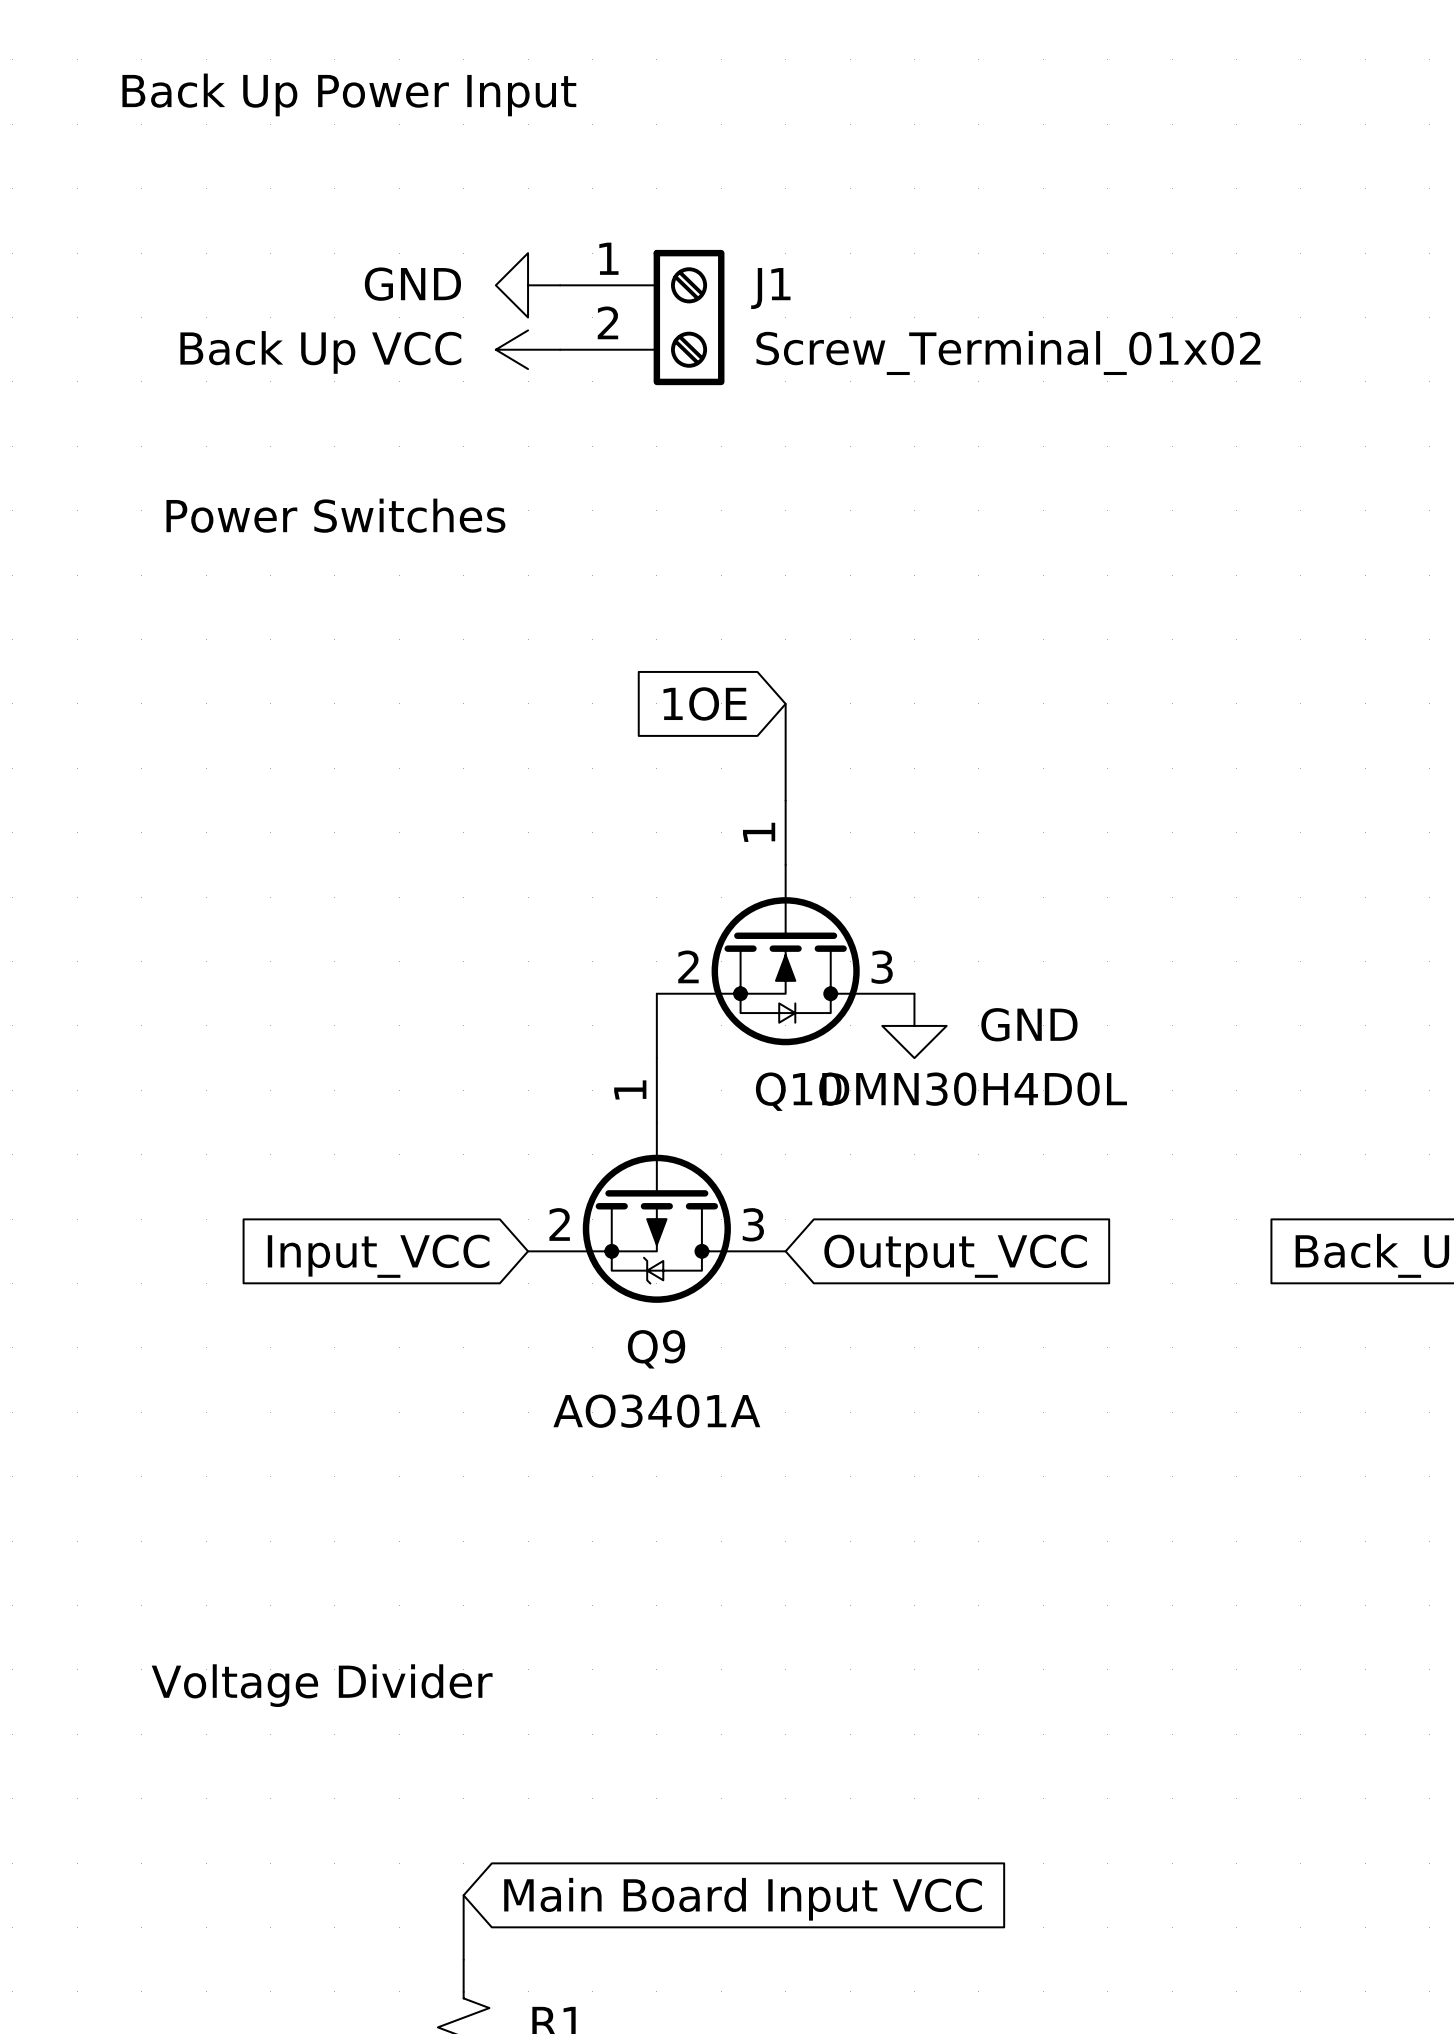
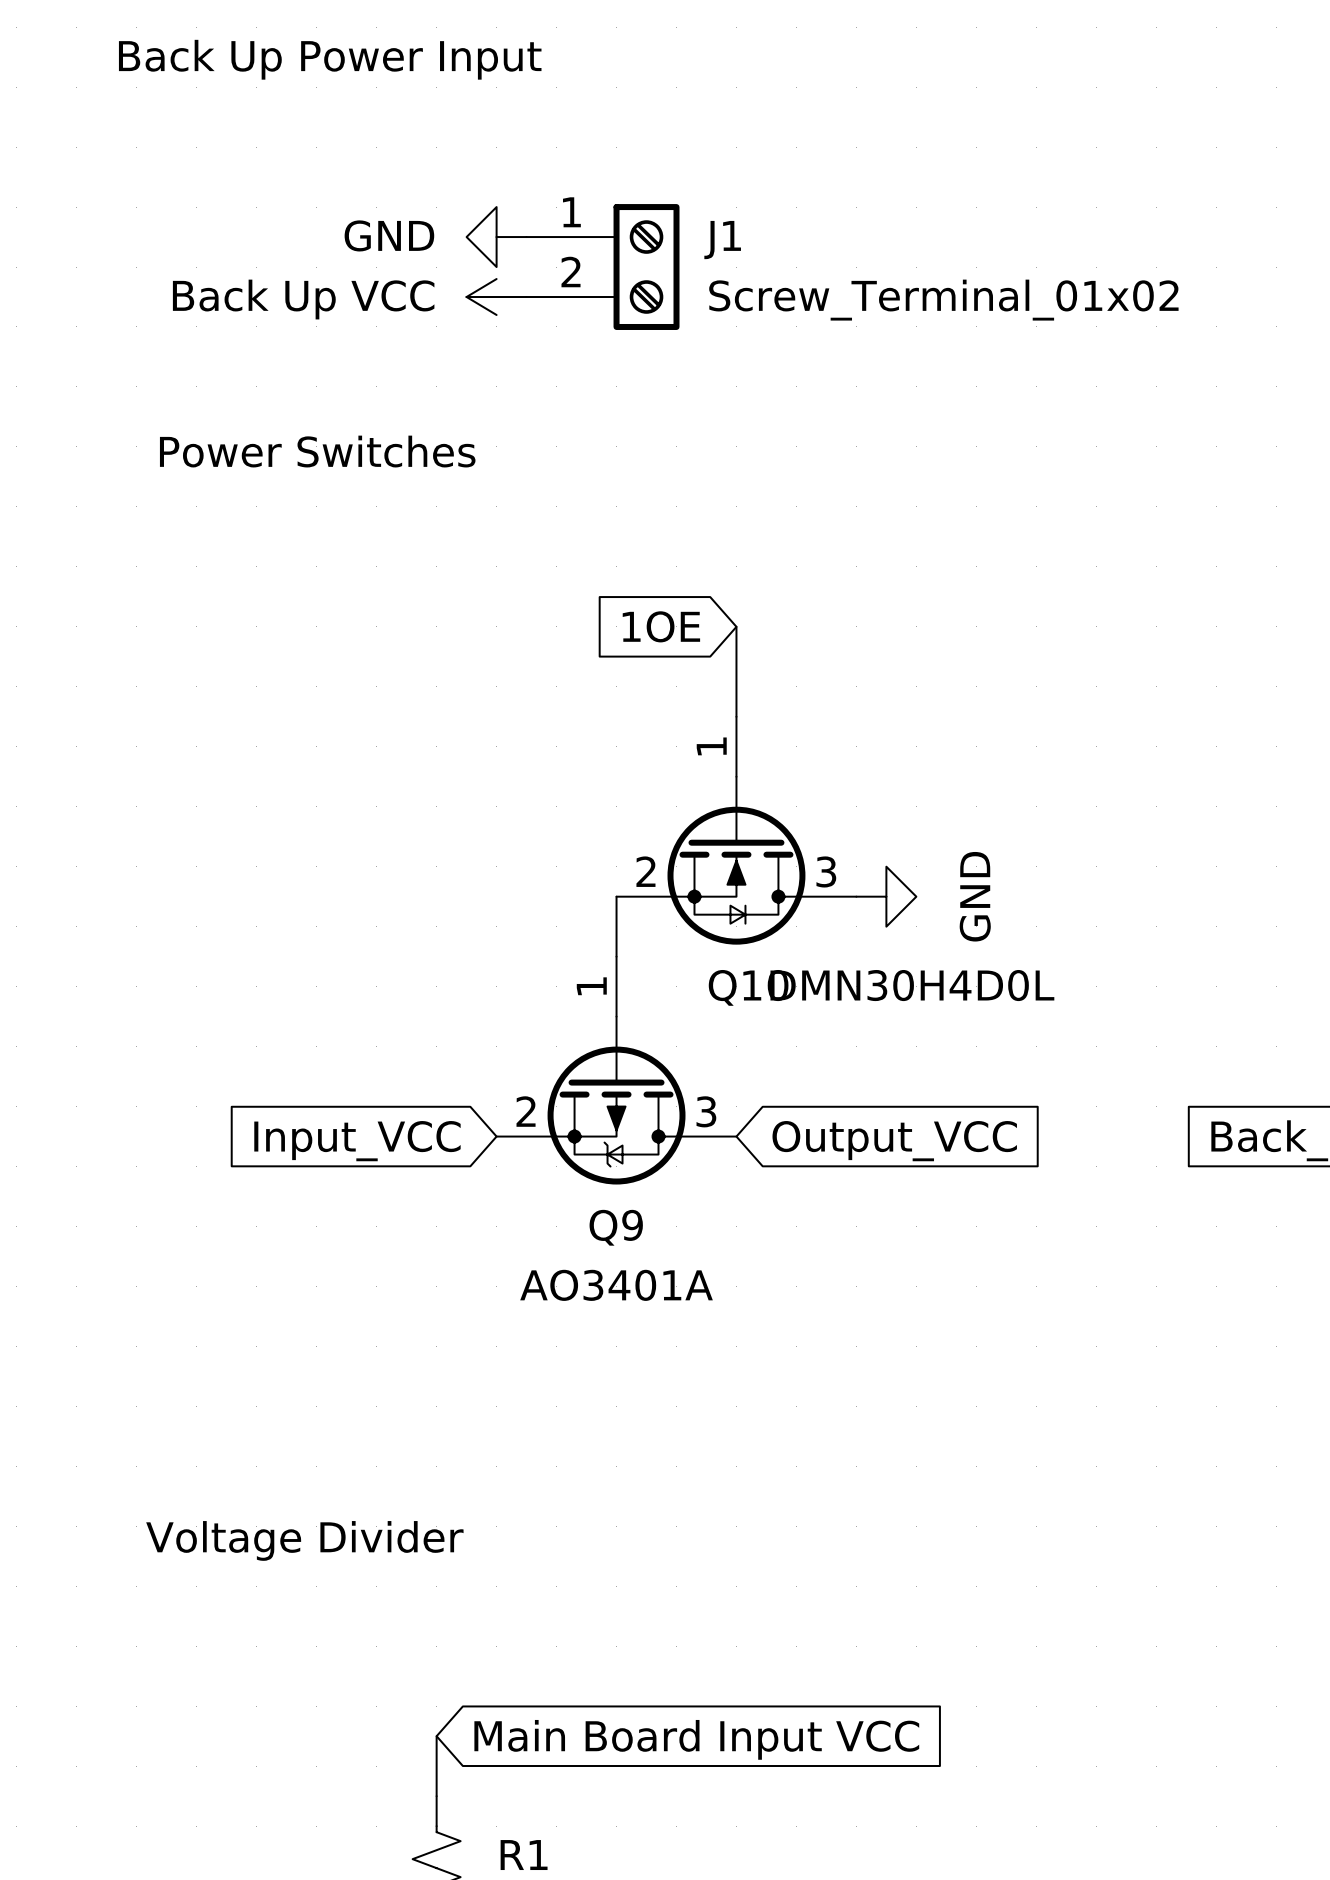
power symbol rotation: 0° (914, 1025) -> 90° counterclockwise (886, 896)
power symbol position: GND (914, 1025) -> GND (886, 896)

